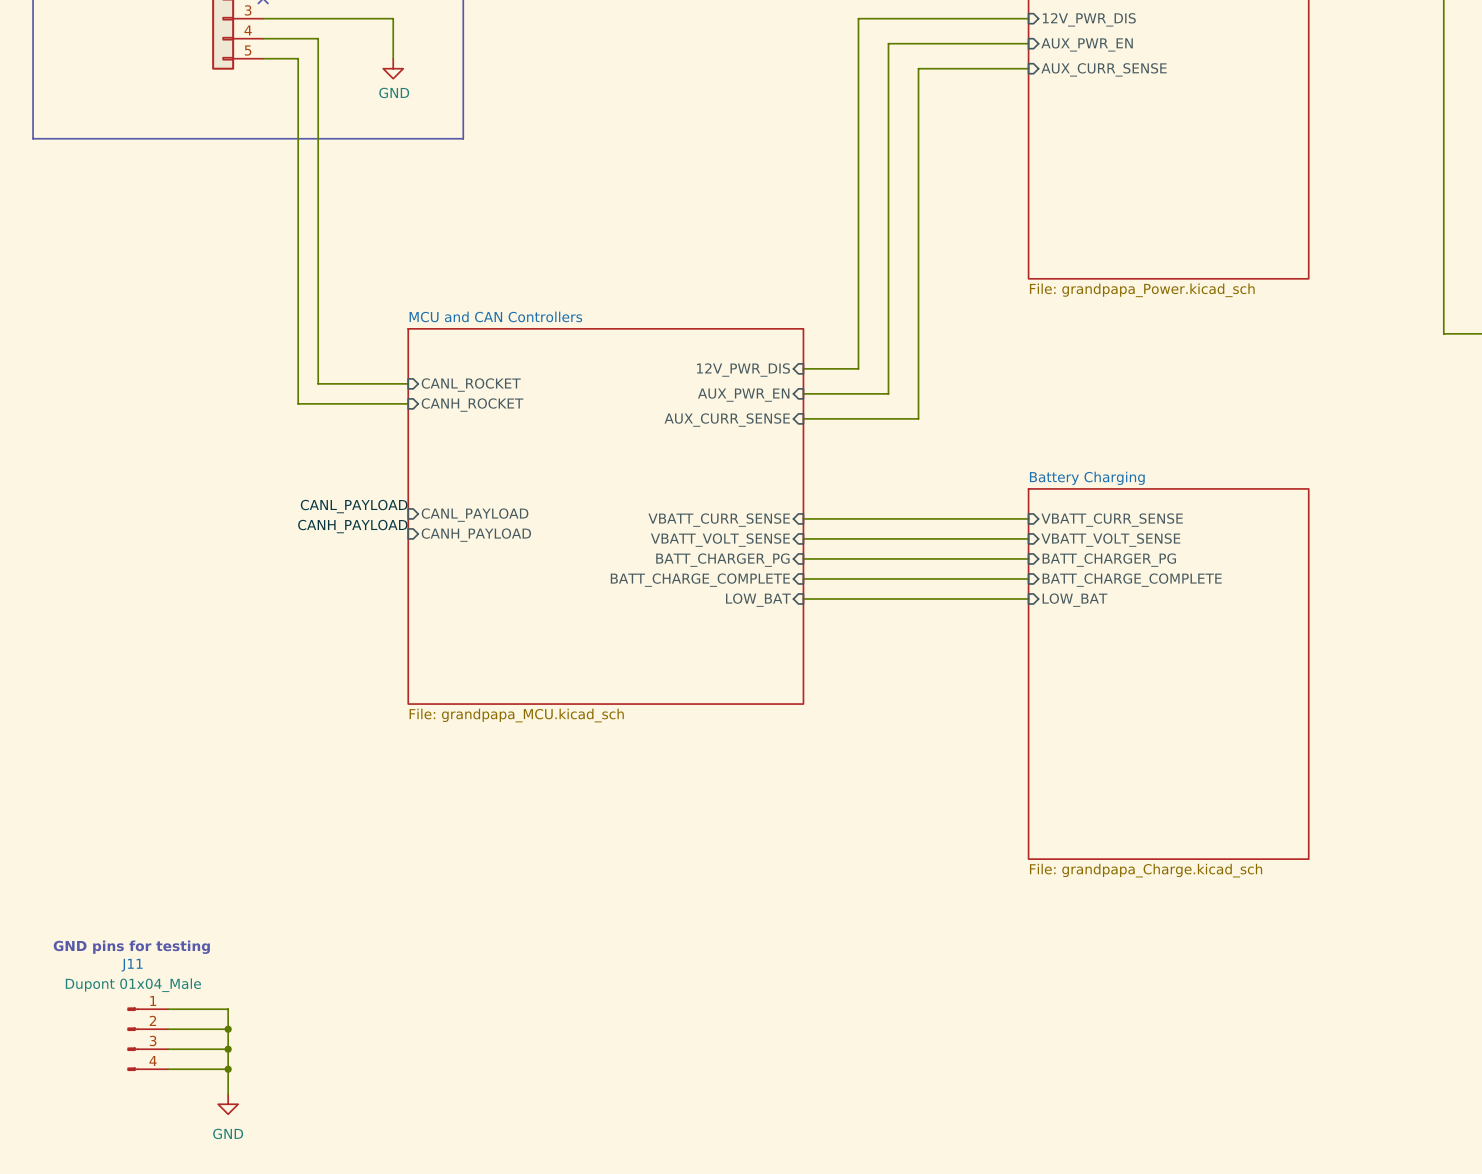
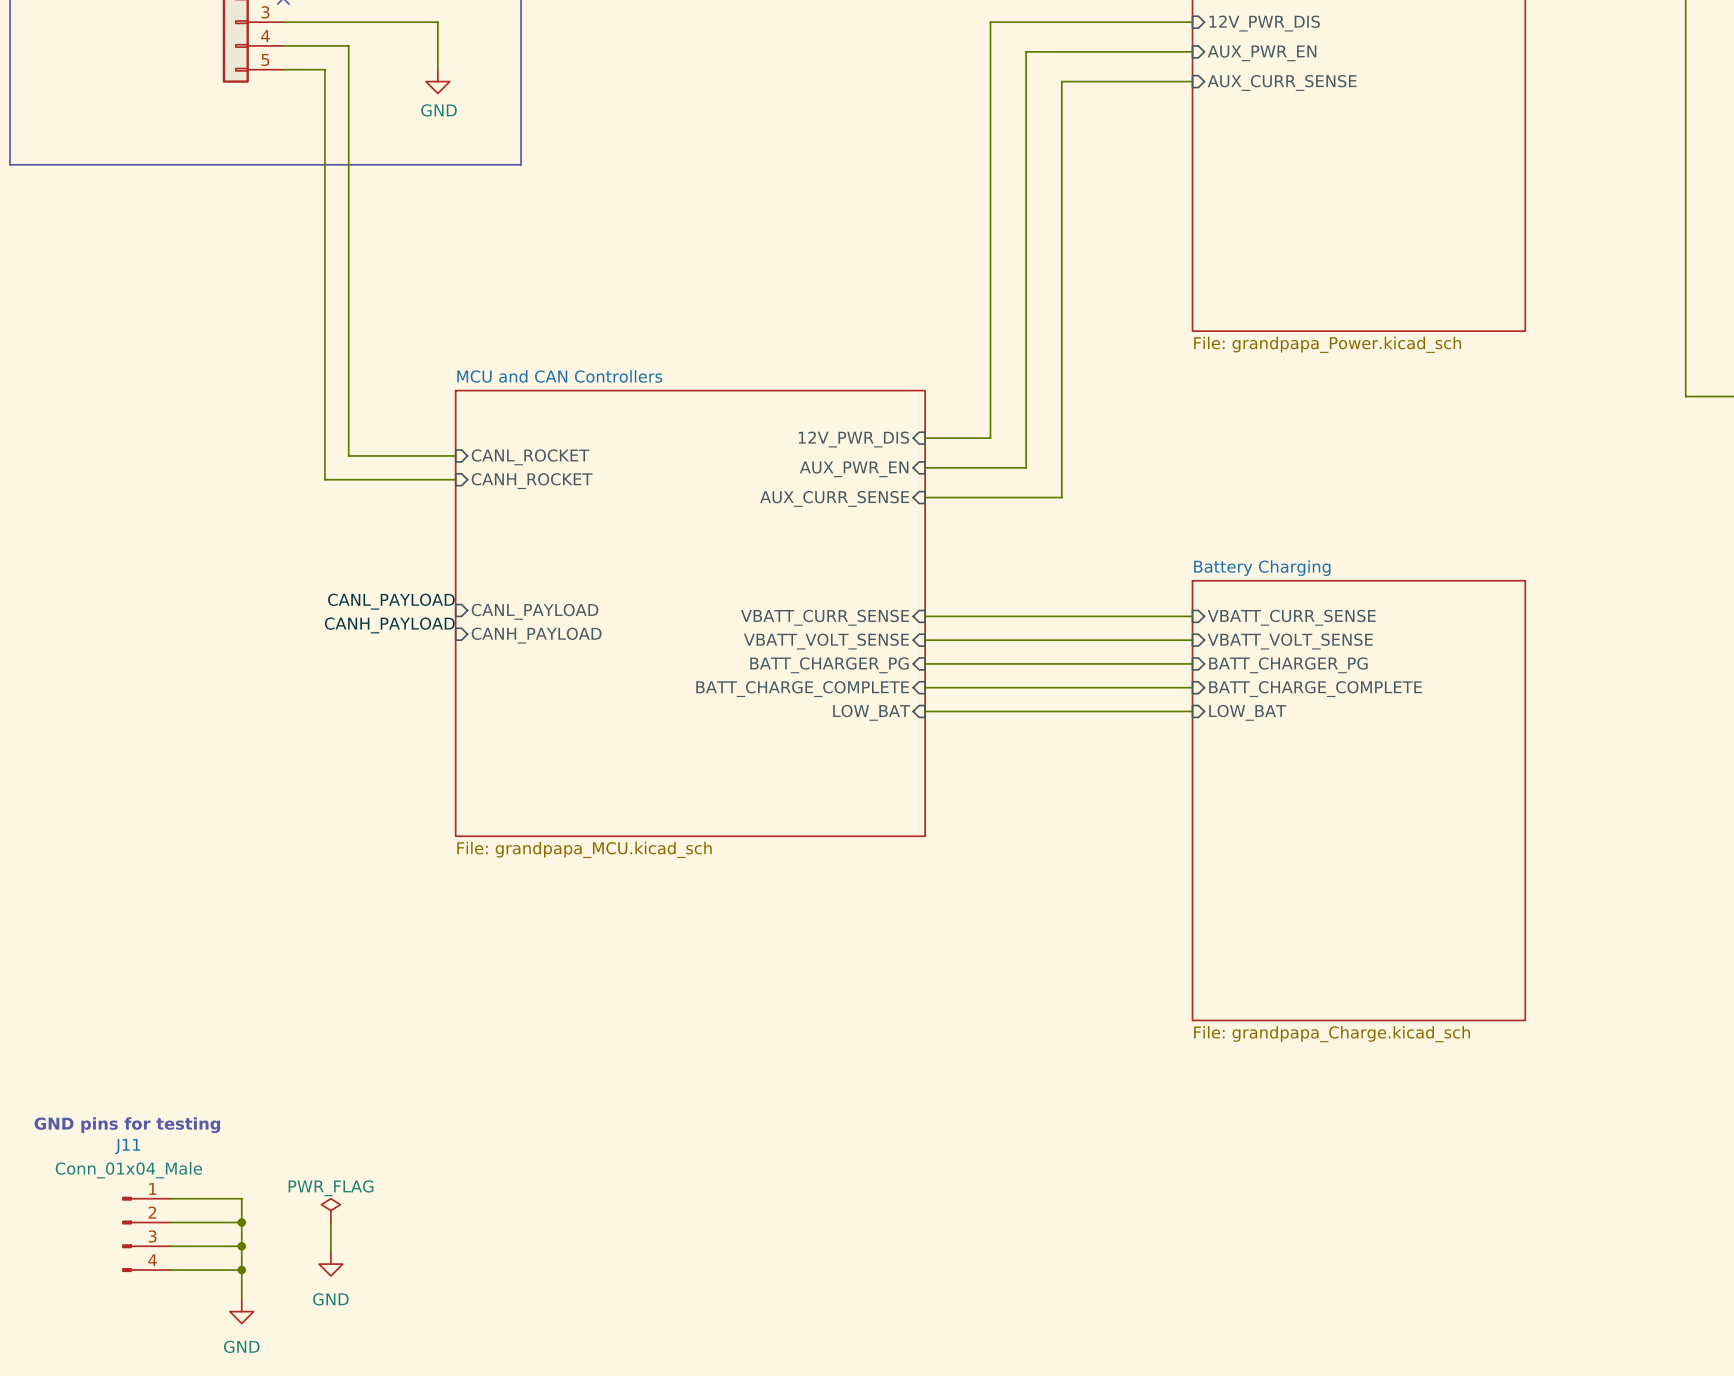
J11 value: Dupont 01x04_Male (133, 985) -> Conn_01x04_Male (128, 1170)
power symbol: none -> PWR_FLAG (330, 1210)
wire: none -> (330, 1222) (330, 1252)
power symbol: none -> GND (330, 1264)

